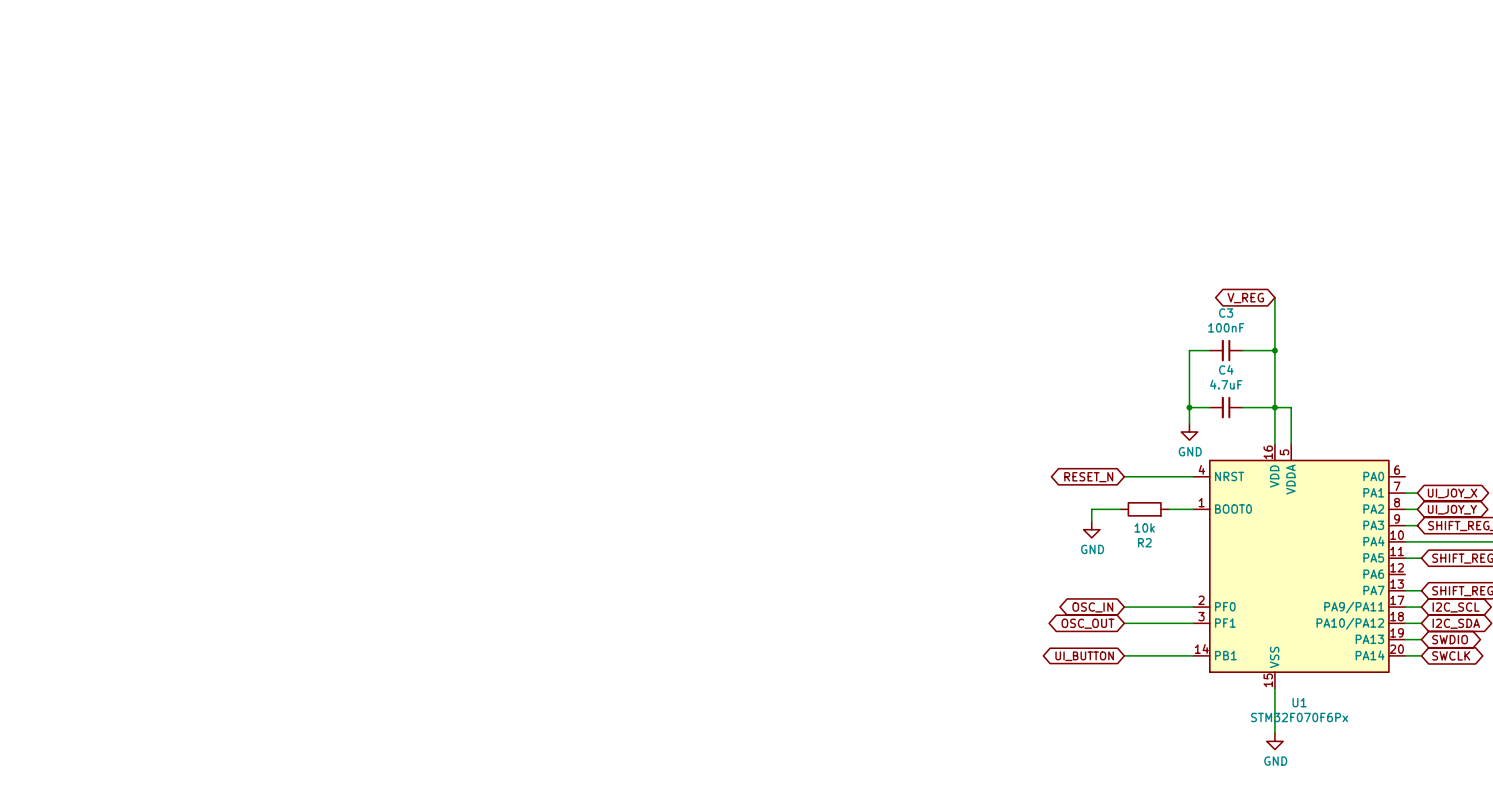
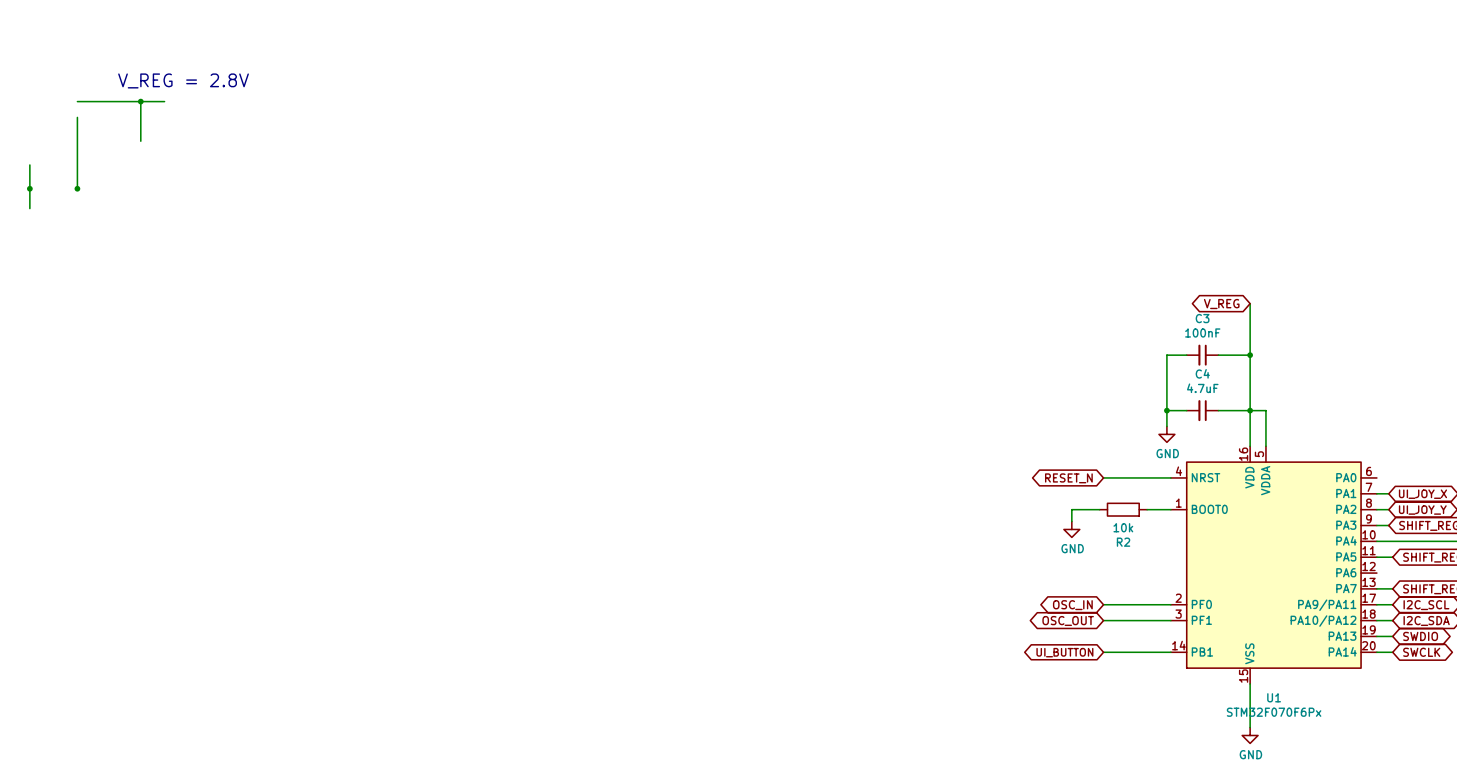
text: none -> V_REG = 2.8V (183, 80)
wire: none -> (77, 101) (164, 101)
wire: none -> (140, 101) (140, 141)
junction: none -> (140, 101)
wire: none -> (77, 117) (77, 188)
wire: none -> (29, 164) (29, 208)
junction: none -> (29, 188)
junction: none -> (77, 188)

